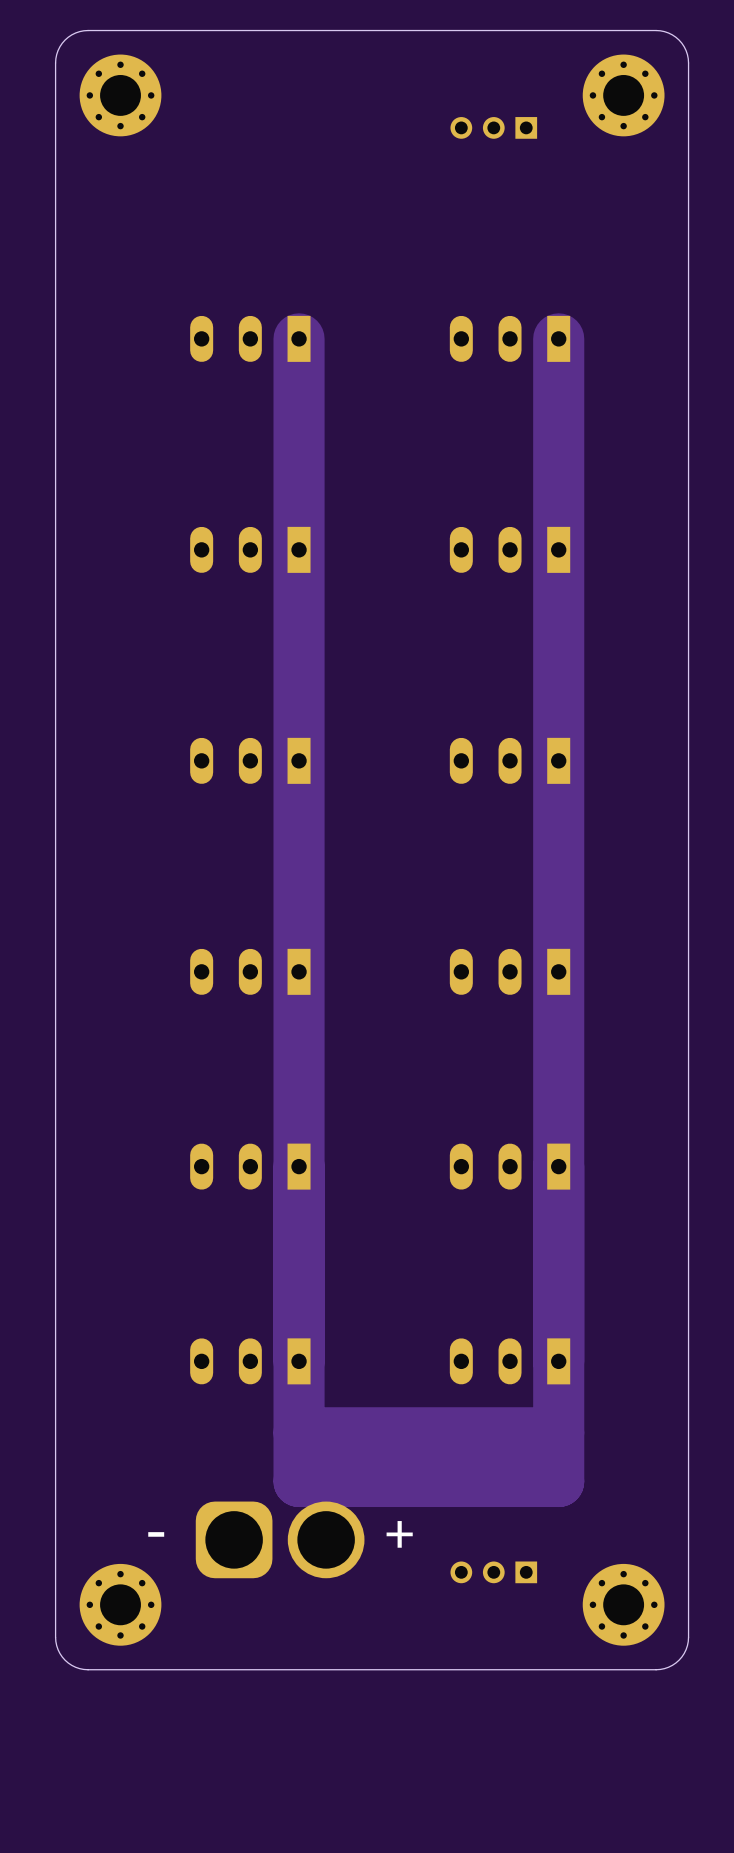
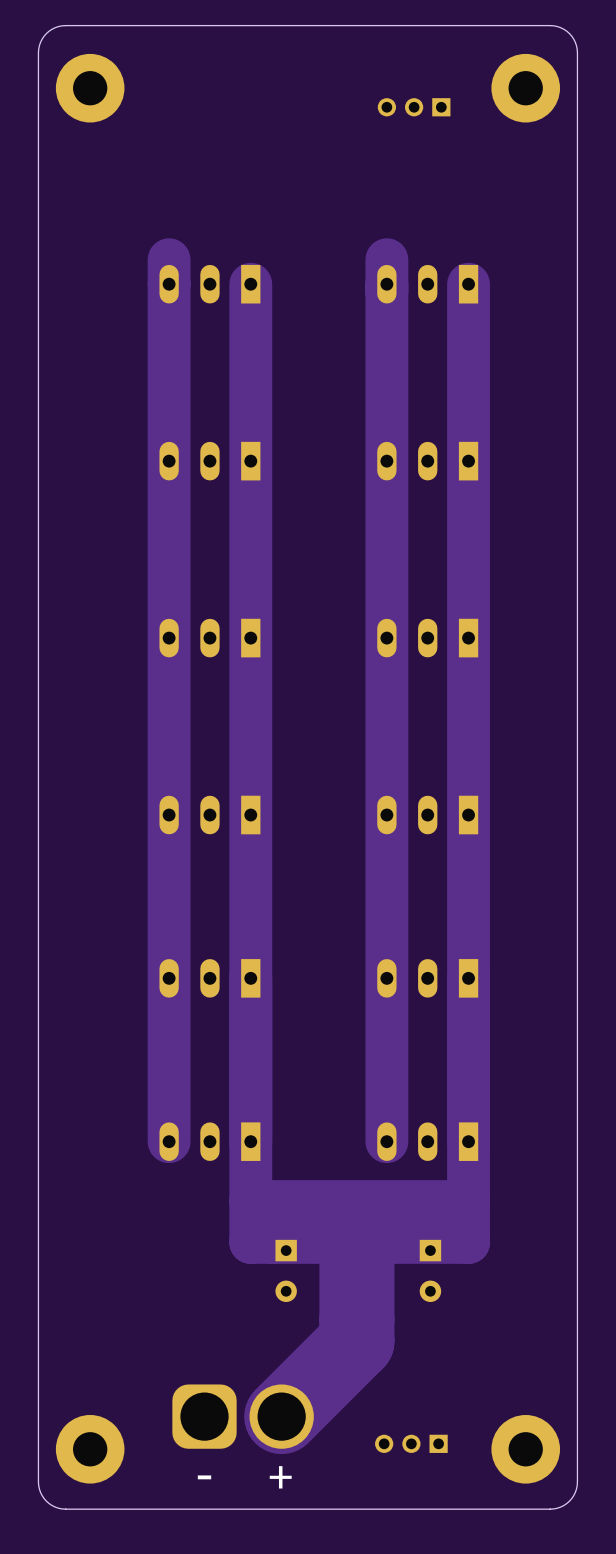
board edge: (88, 30) (75, 32) (65, 40) (58, 50) (55, 62) (55, 1637) (58, 1649) (65, 1660) (71, 1665) (88, 1669) (656, 1669) (668, 1667) (679, 1660) (686, 1649) (688, 1637) -> (73, 25) (58, 26) (49, 31) (40, 42) (38, 52) (38, 1481) (40, 1492) (49, 1503) (65, 1509) (557, 1508) (569, 1501) (577, 1485) (577, 1373)
part footprint: [582, 54, 665, 137] -> [491, 53, 561, 123]
part: (120, 95) -> none
part: none -> (90, 88)
track: none -> (169, 259) (169, 1141)
track: none -> (386, 259) (386, 1141)
track: none -> (356, 1242) (356, 1341) (281, 1416)
part: none -> (286, 1270)
part: none -> (430, 1270)
text position: - (156, 1534) -> - (204, 1477)
text position: + (399, 1534) -> + (280, 1477)
part position: (280, 1539) -> (243, 1416)
part position: (493, 1572) -> (411, 1443)
part: (120, 1604) -> none
part: (623, 1604) -> none
part: none -> (90, 1449)
part: none -> (525, 1449)

